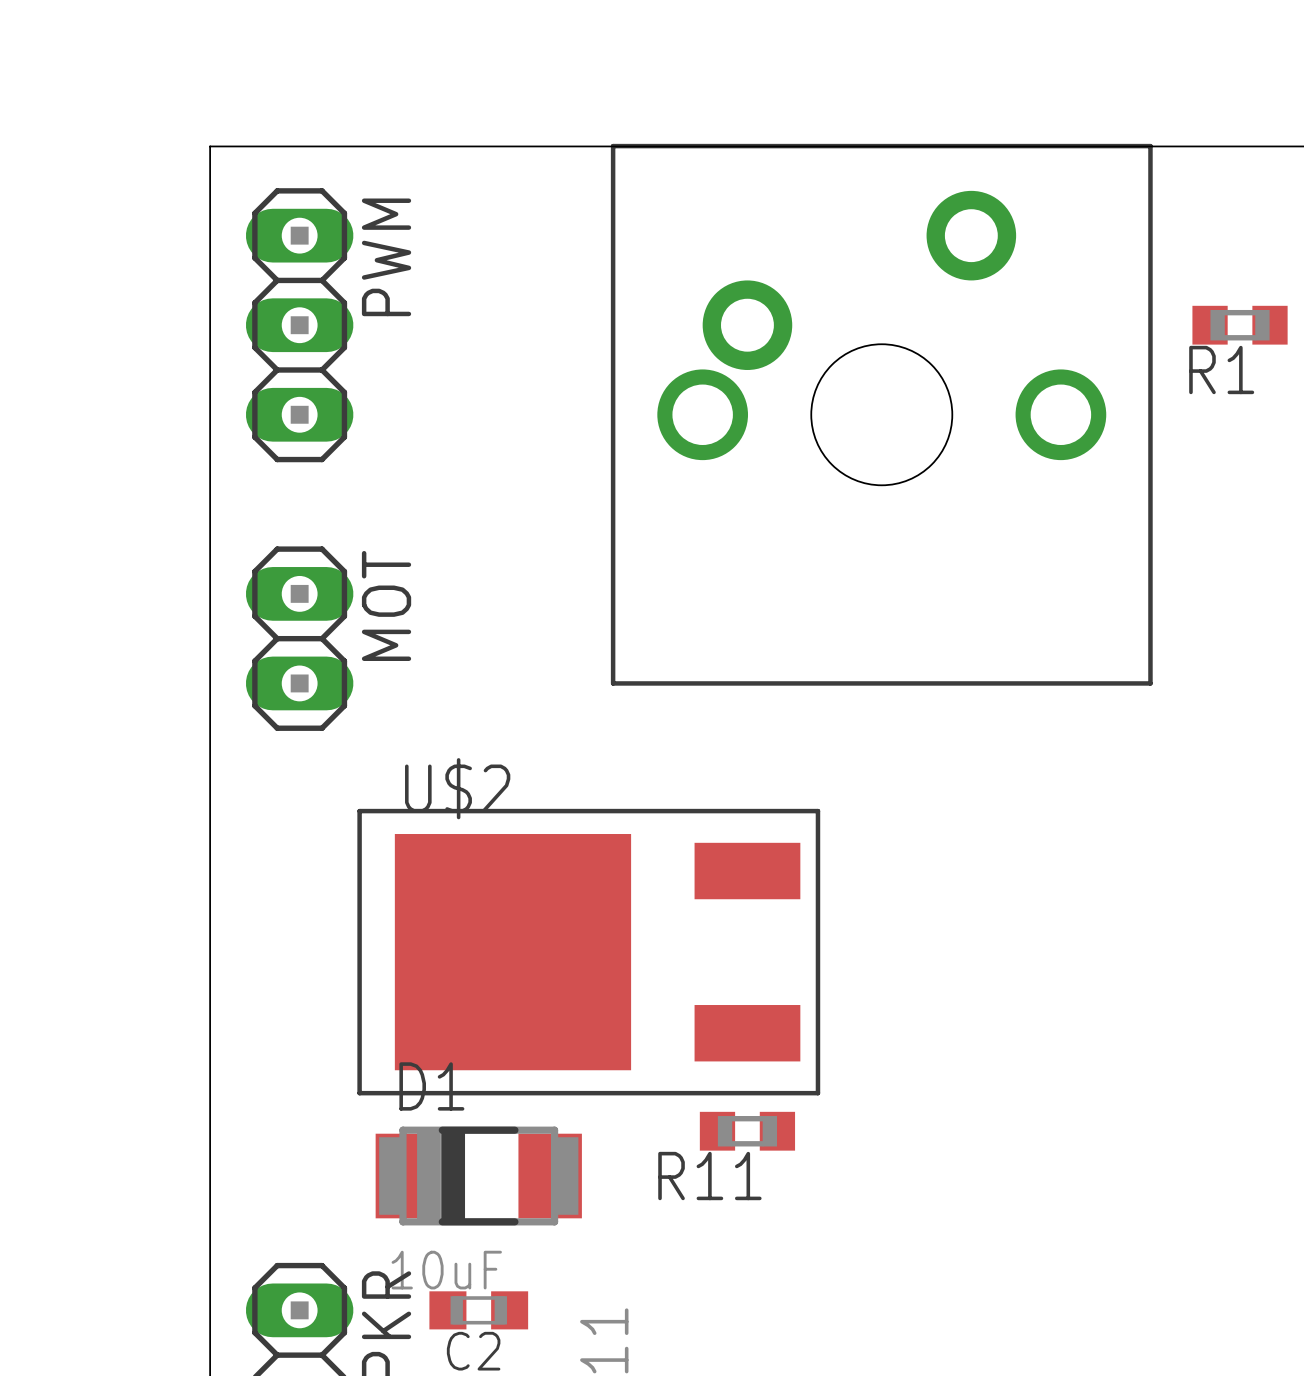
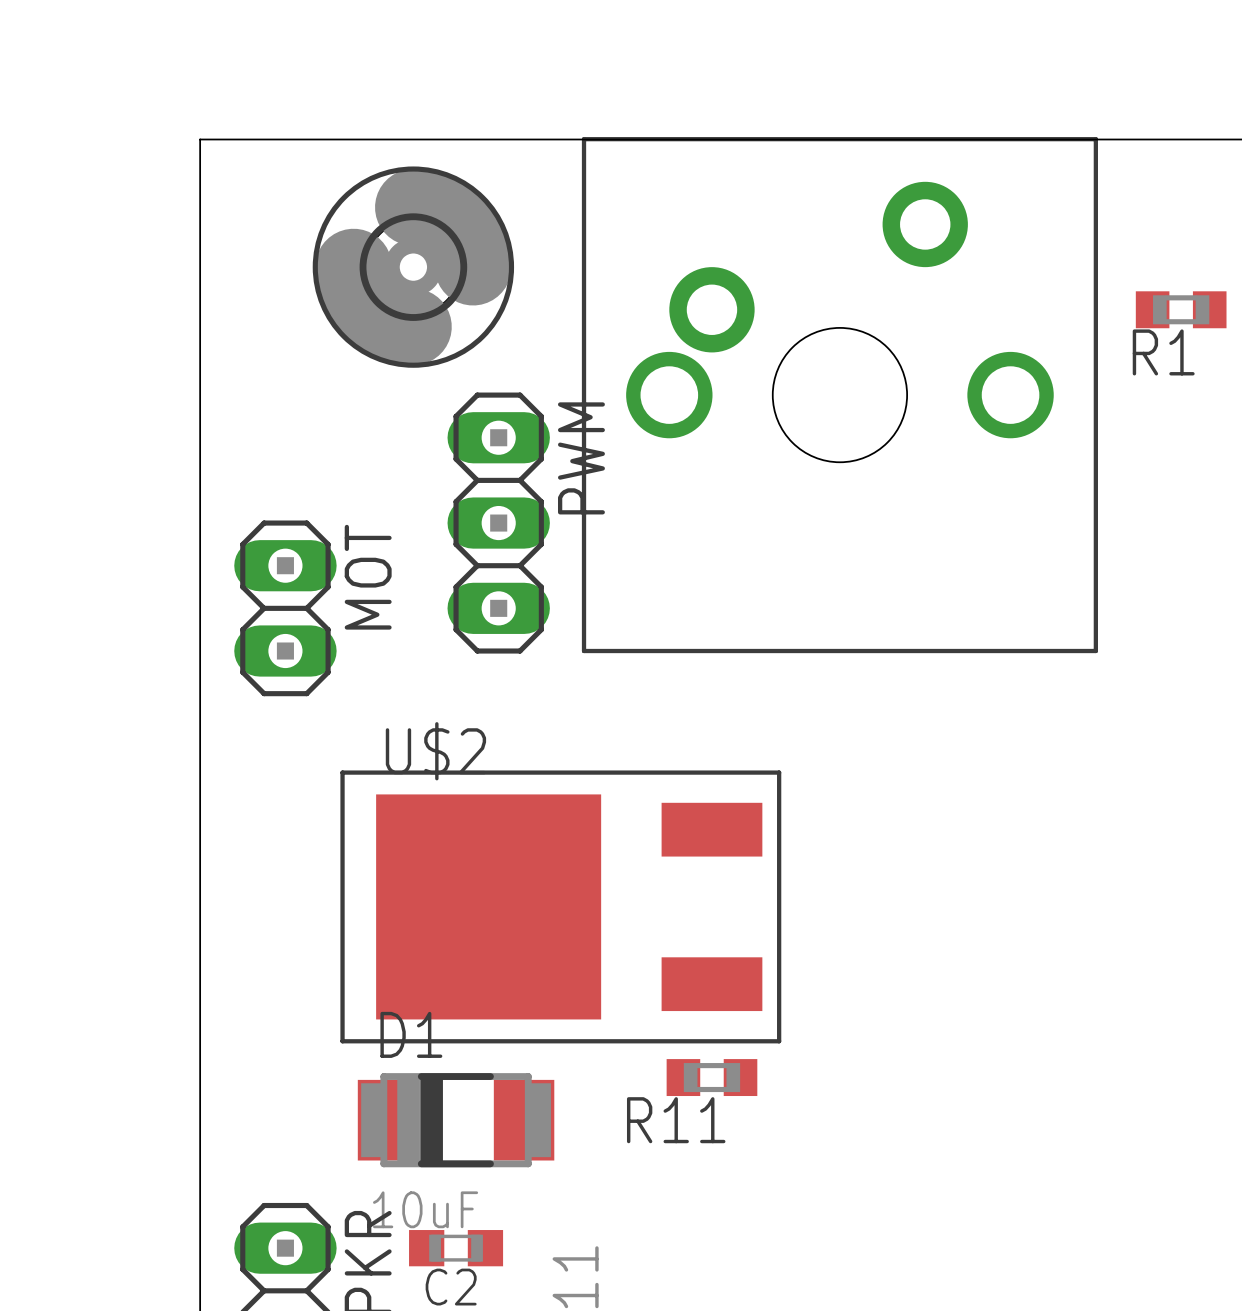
part: none -> (413, 267)
PWM position: (299, 325) -> (498, 523)

